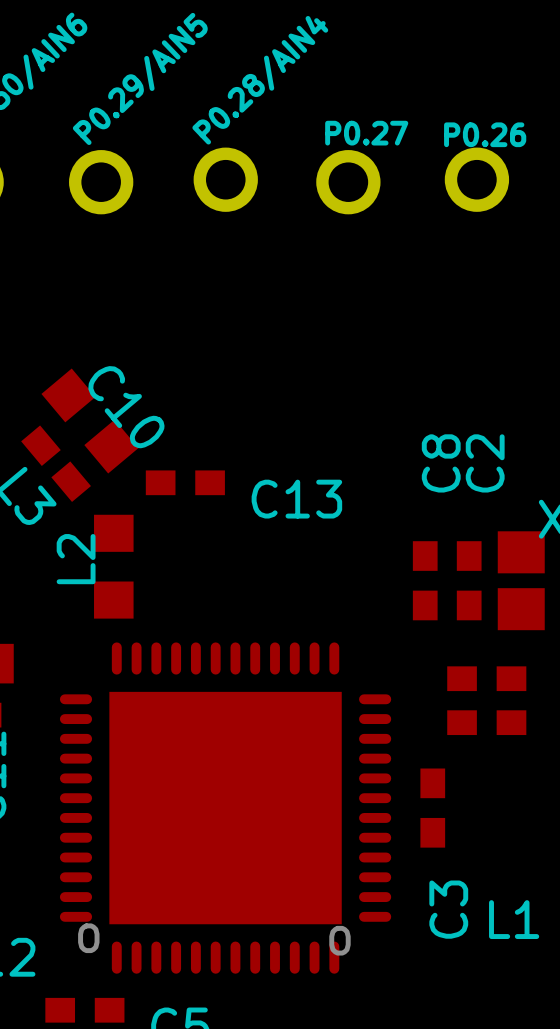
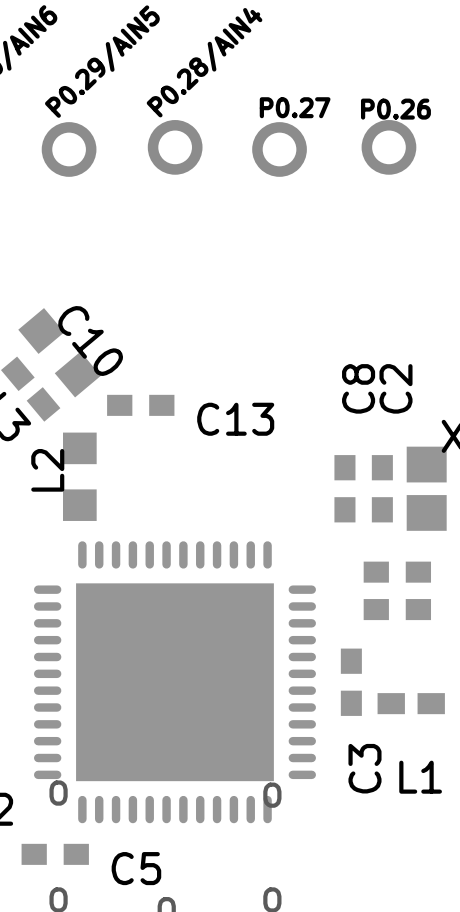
part: none -> (411, 703)

